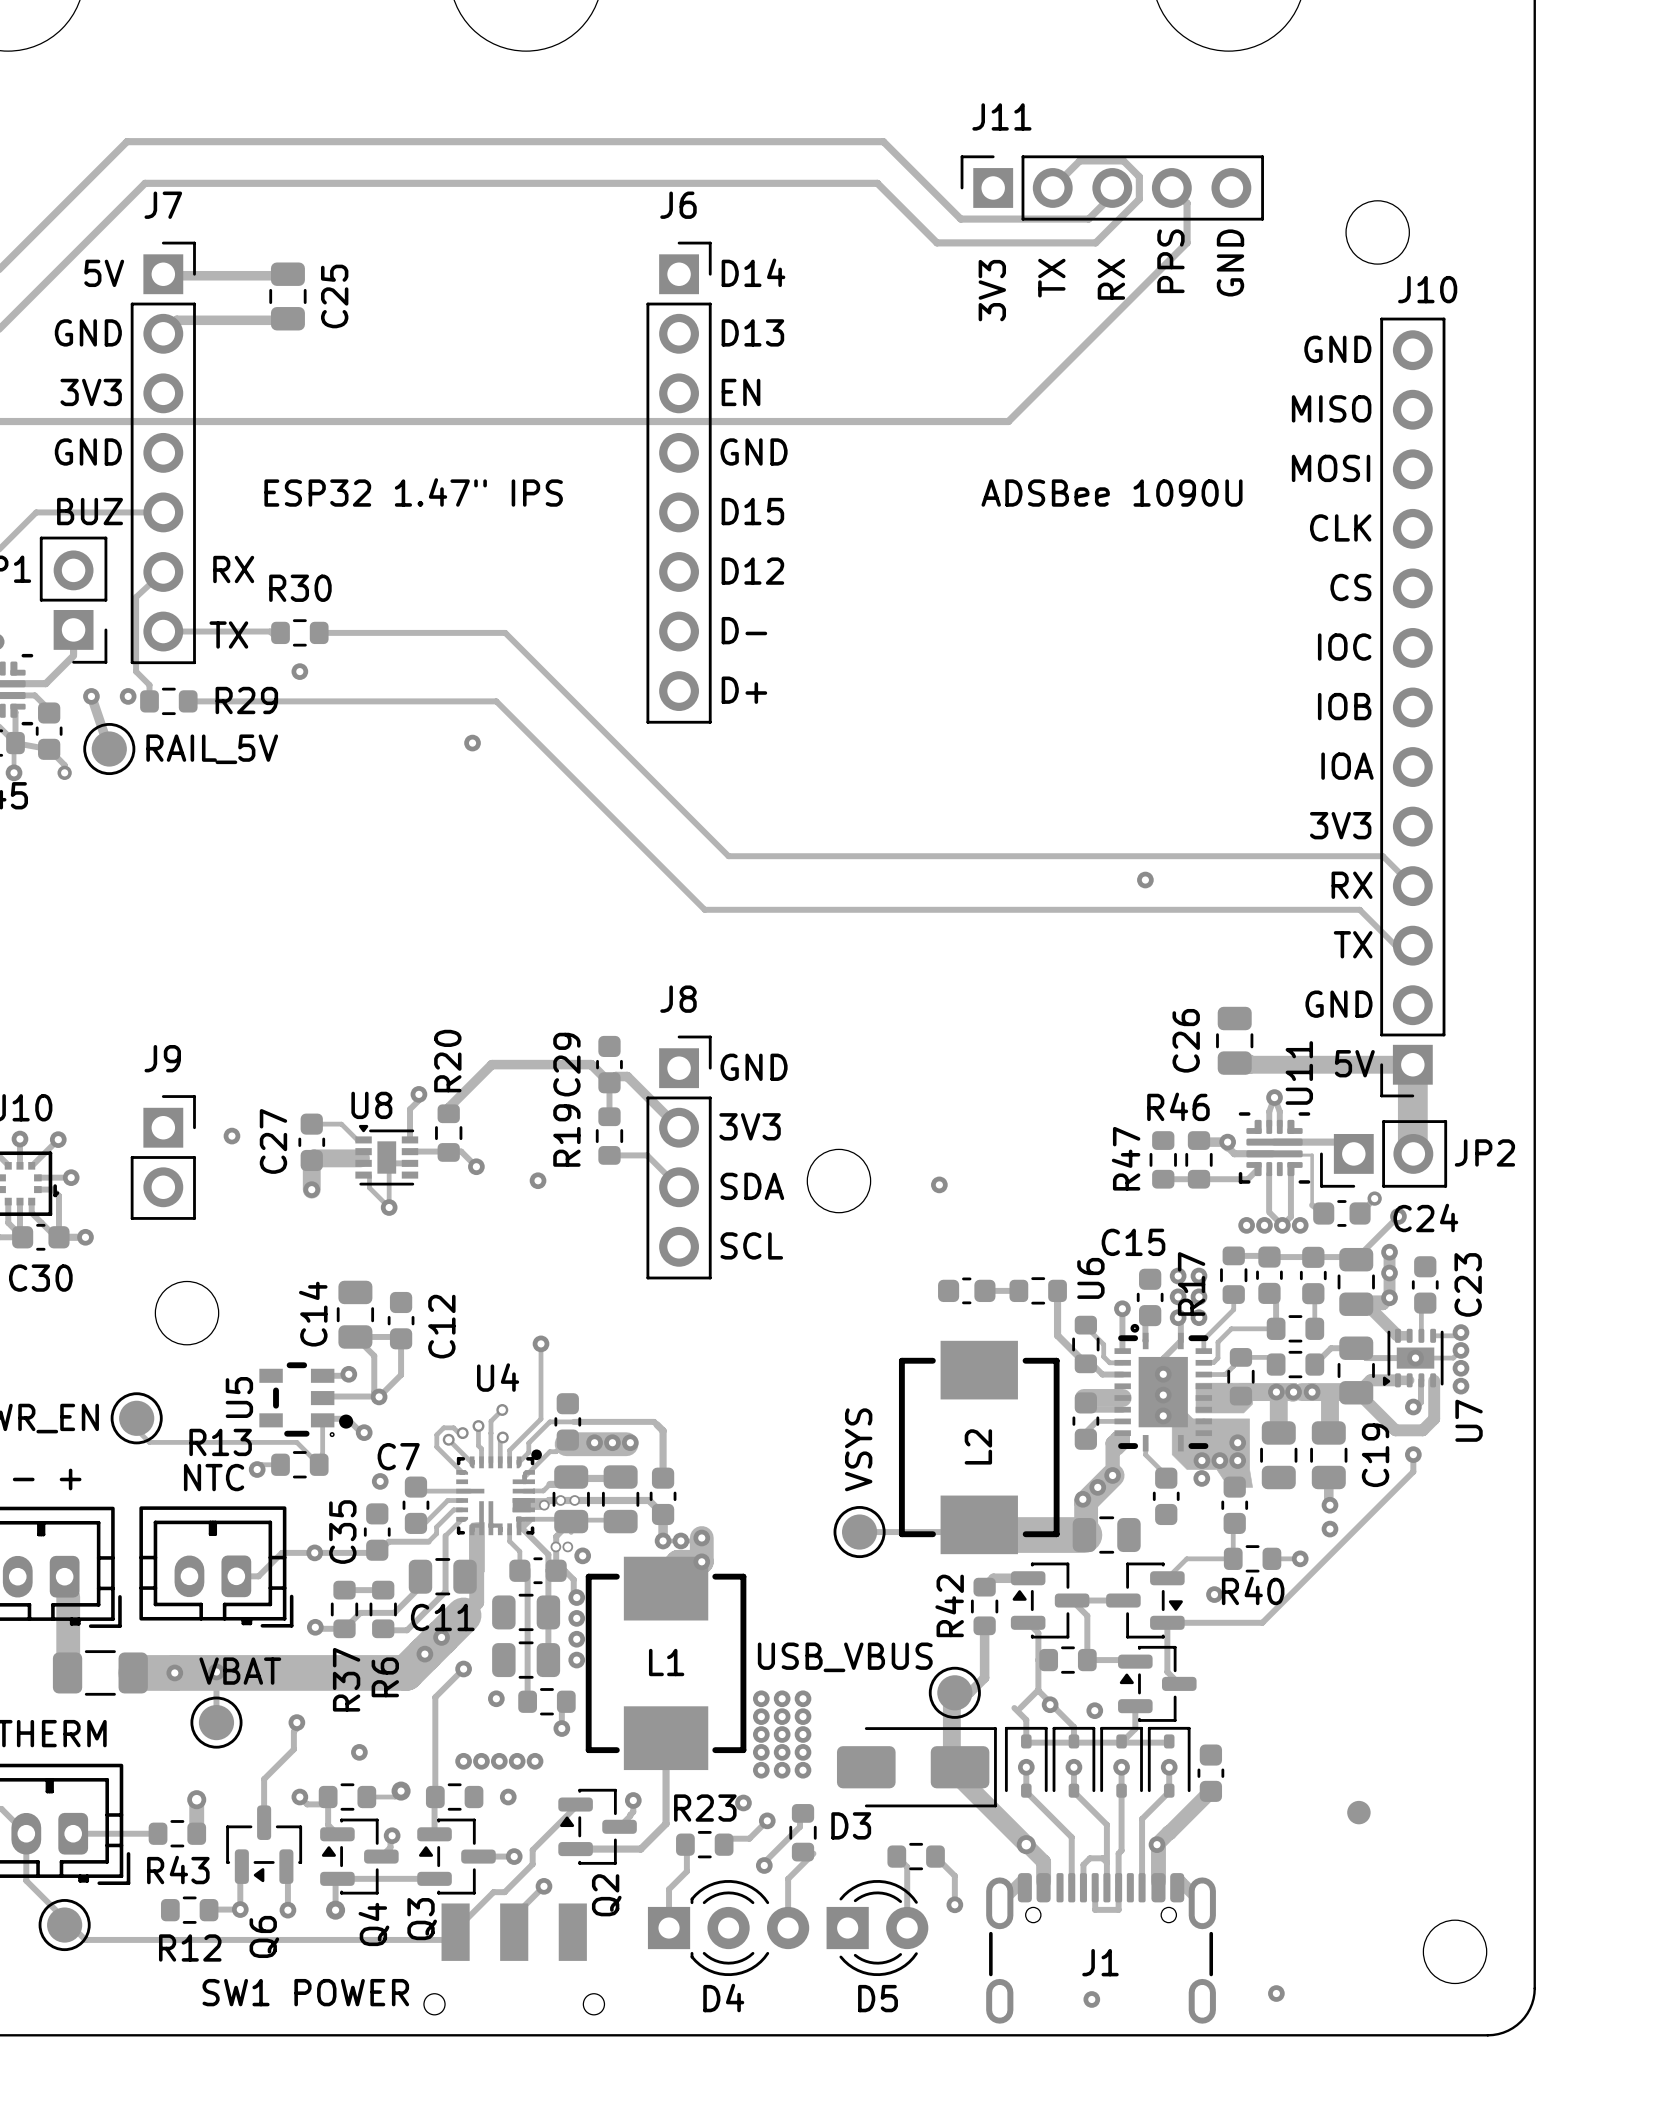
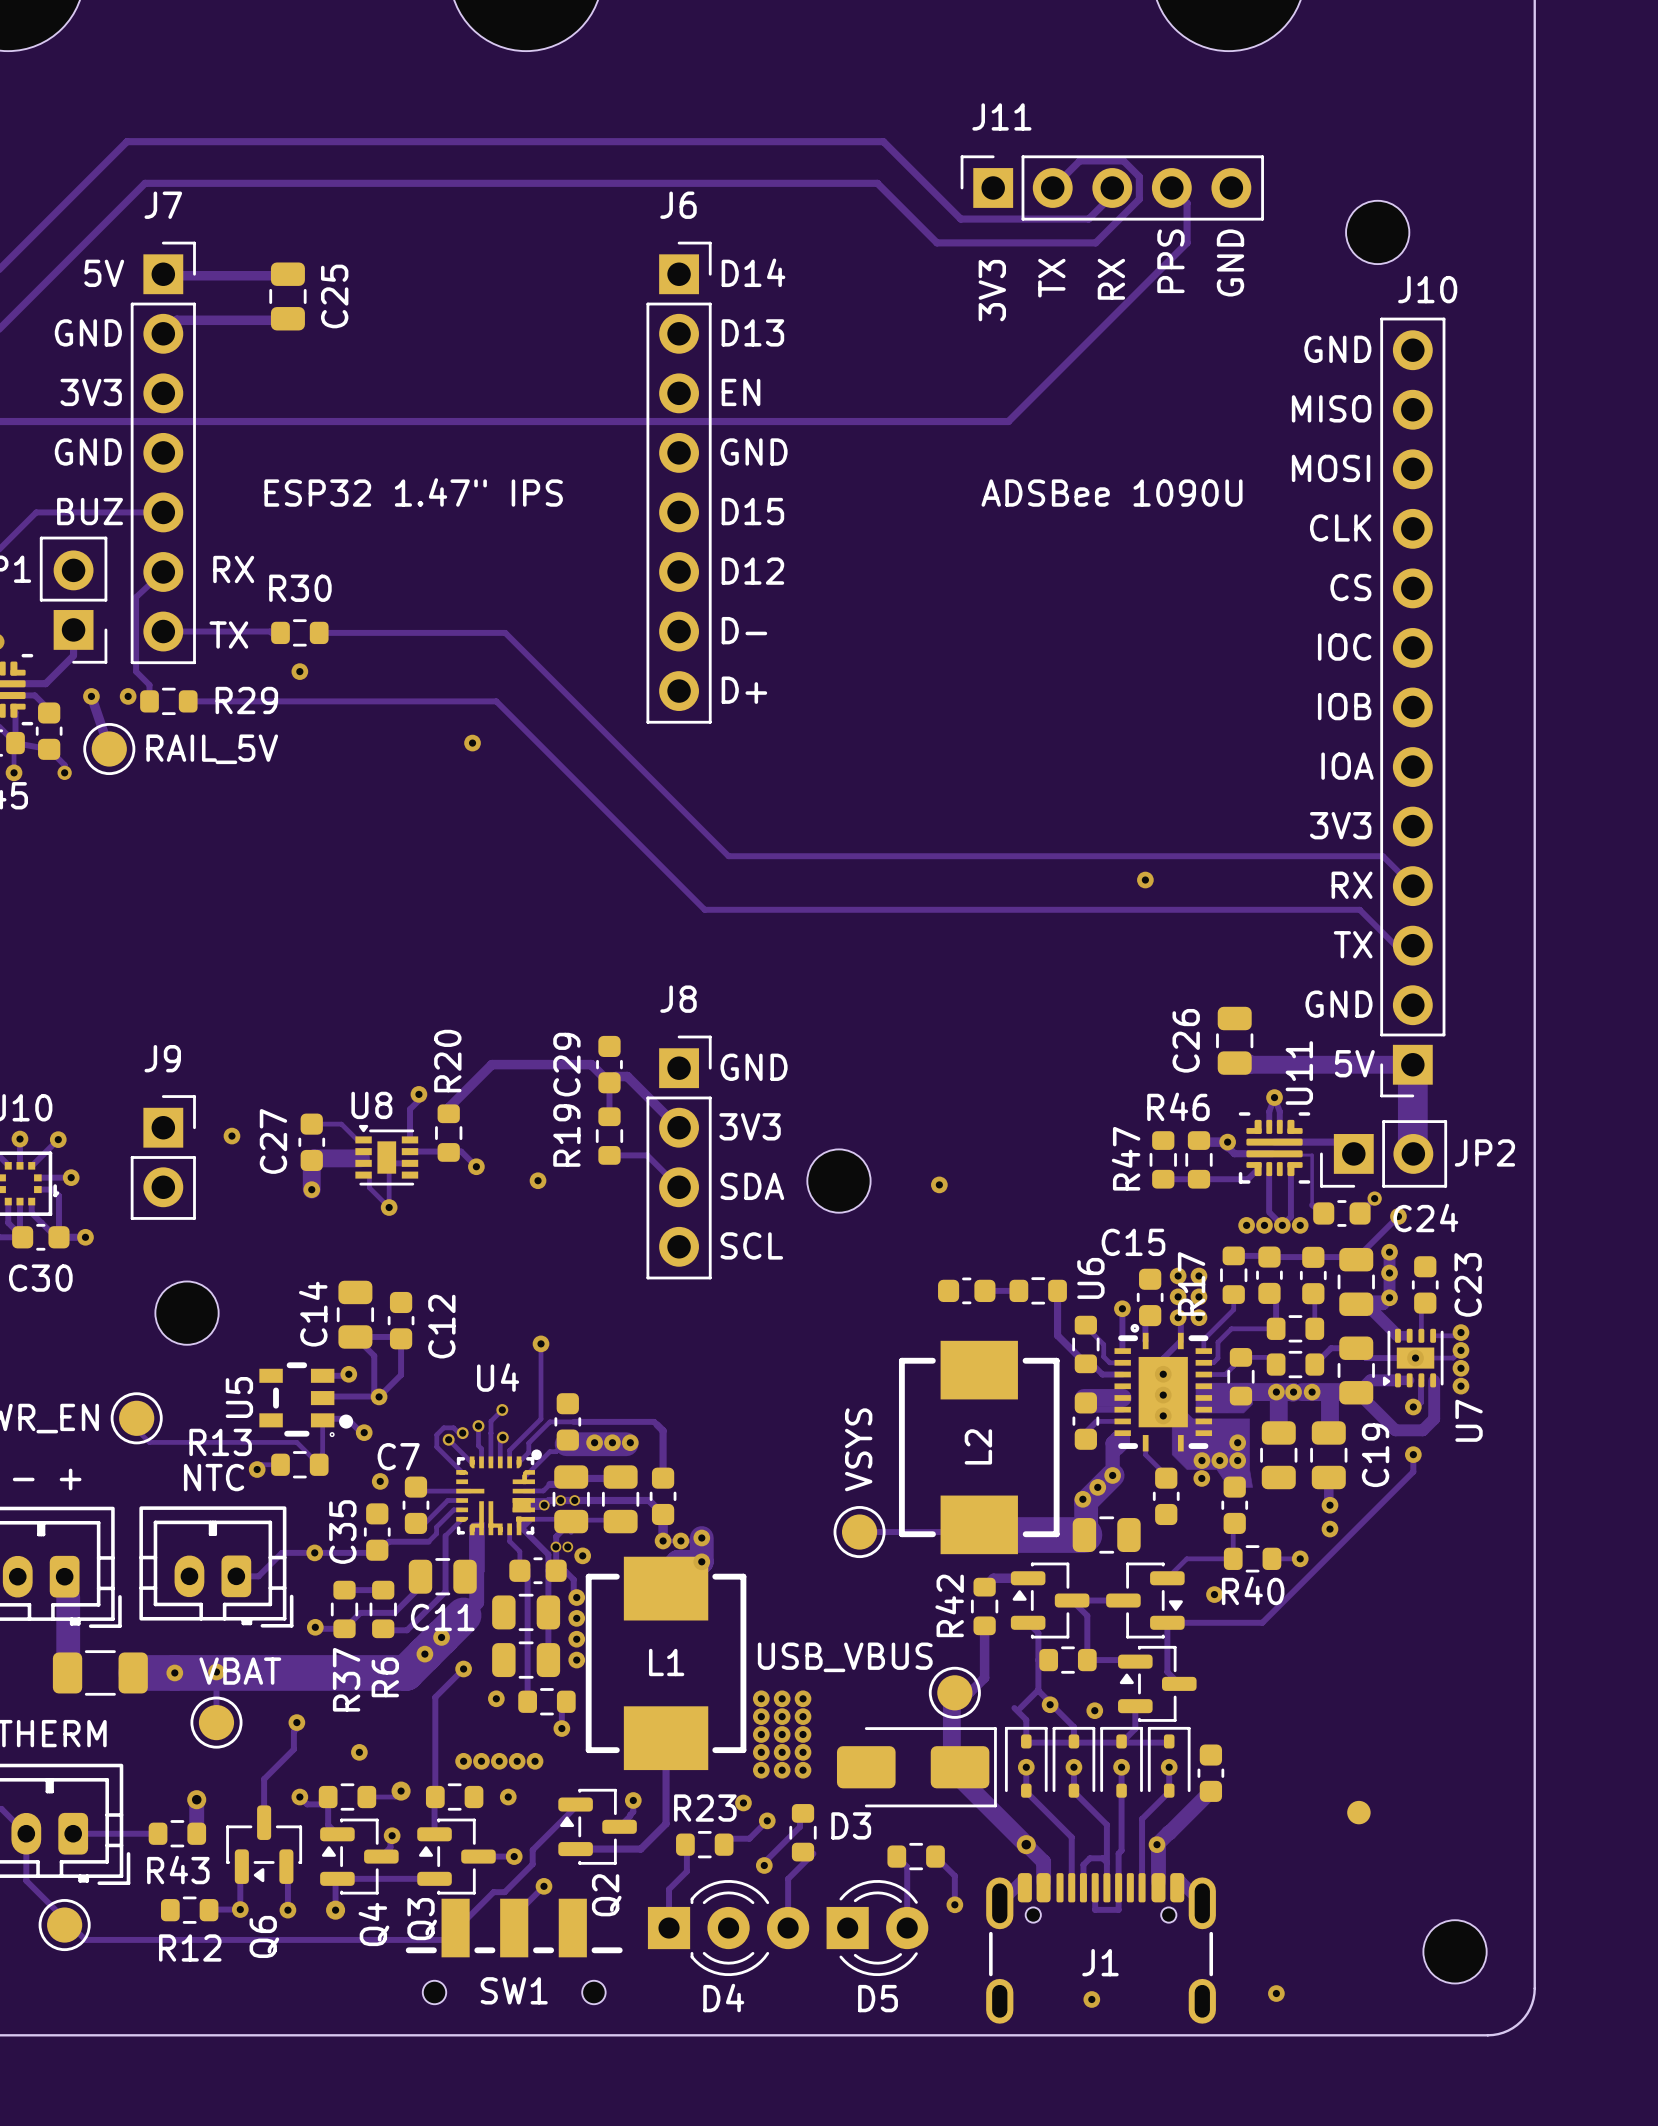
SW1: none -> (514, 1951)
part: (514, 1959) -> none
text: SW1 POWER (305, 1992) -> none

